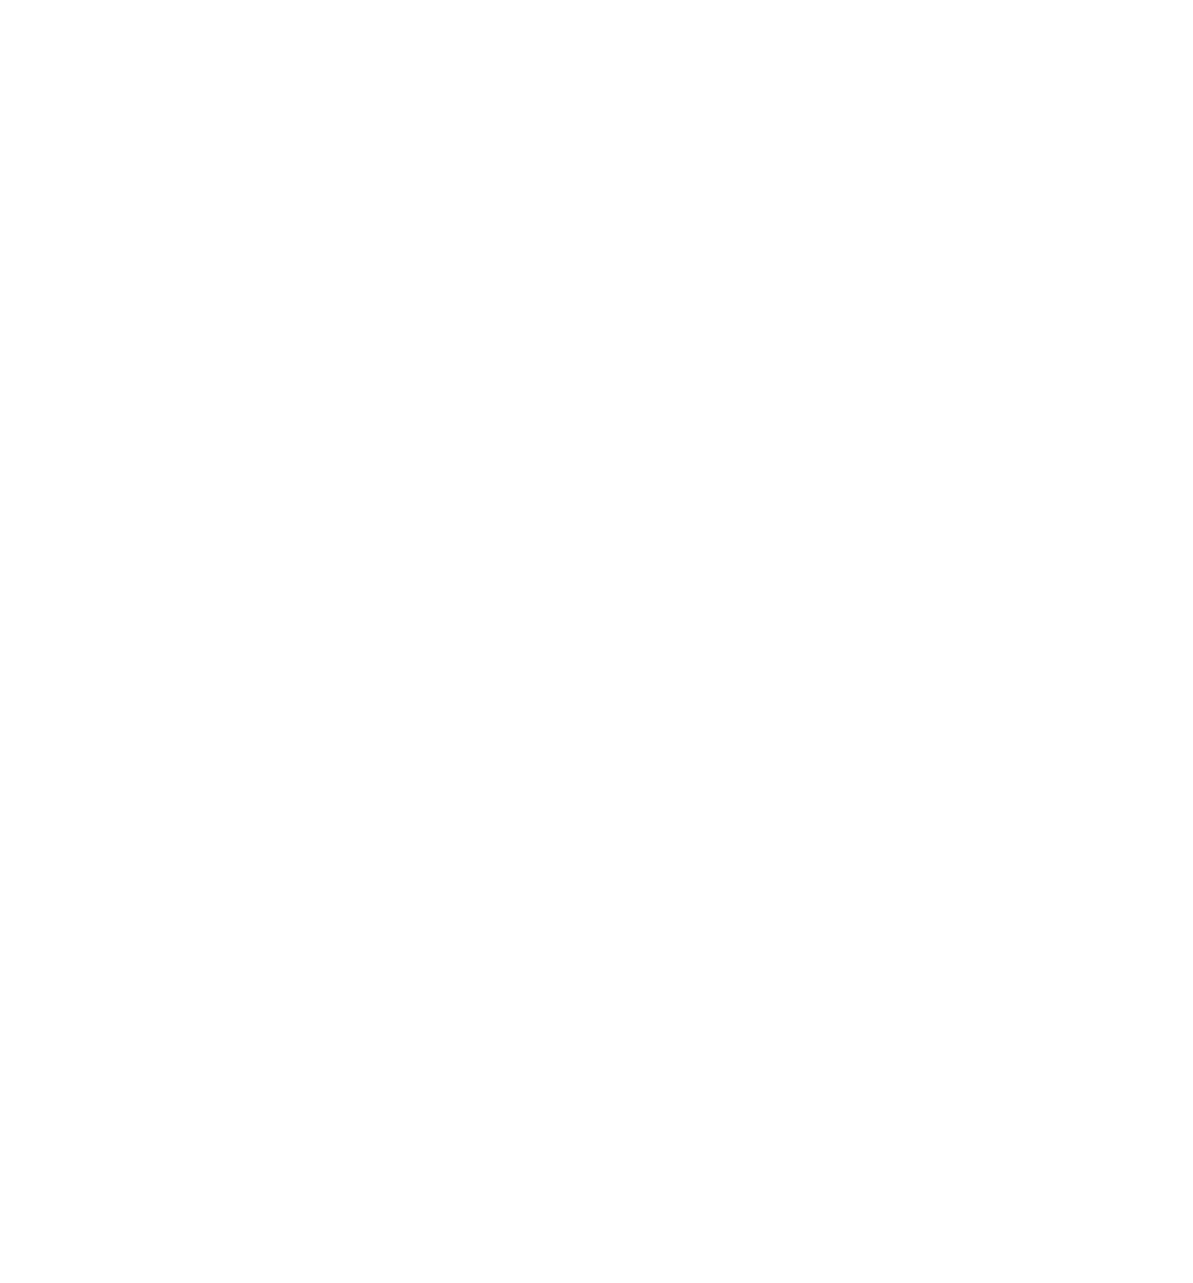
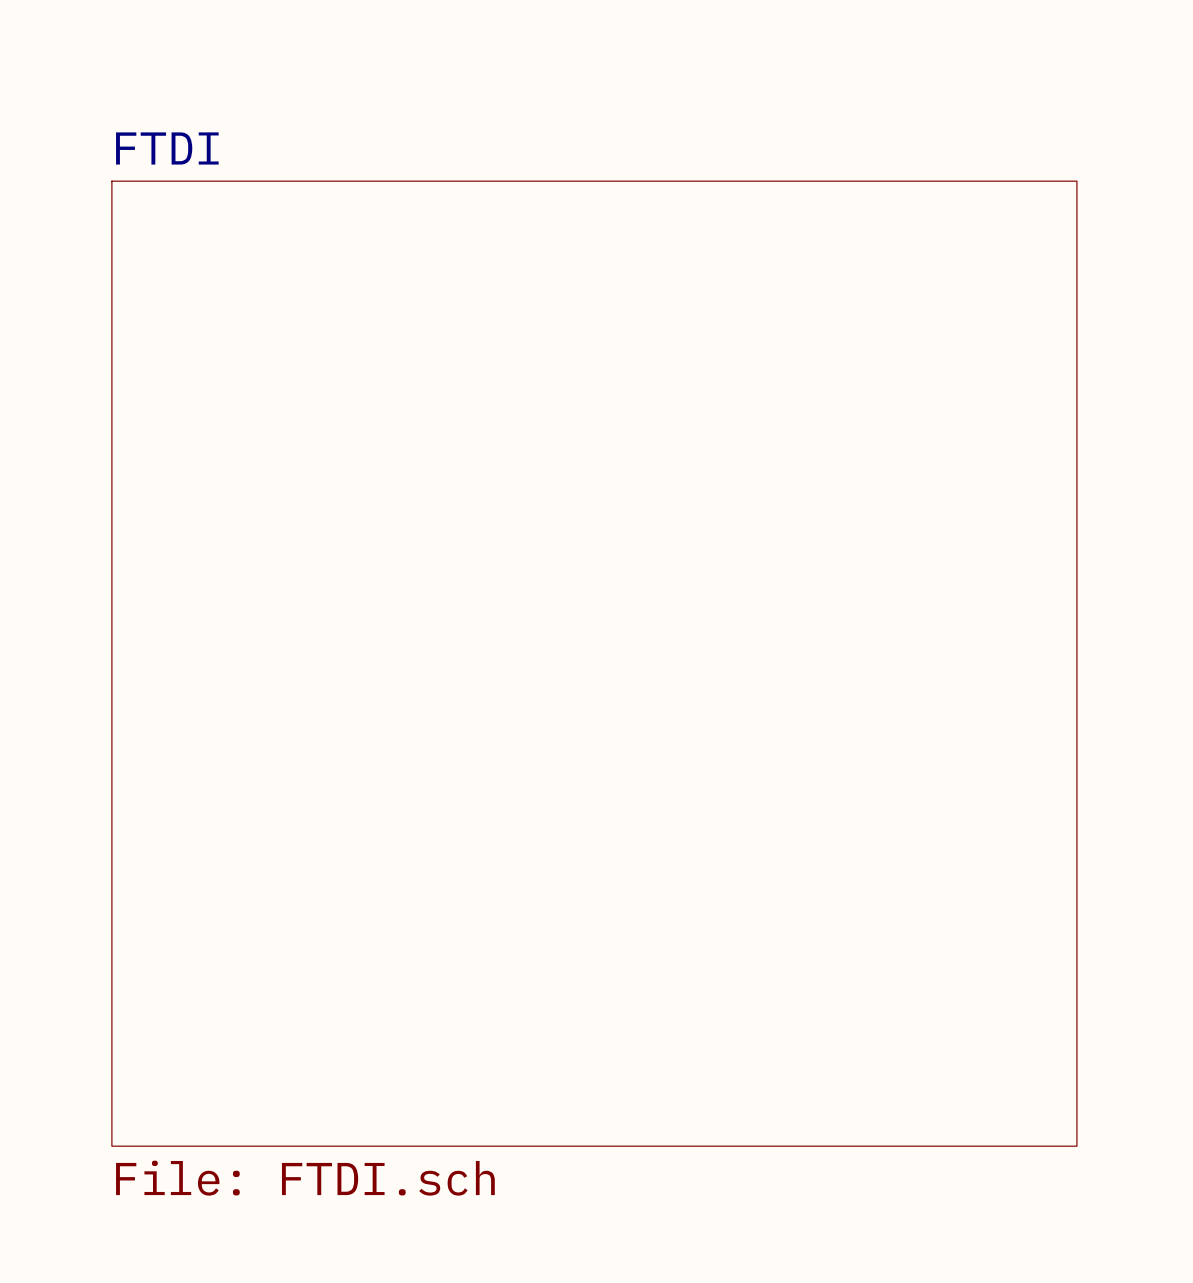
sheet FTDI: none -> File: FTDI.sch (594, 663)

